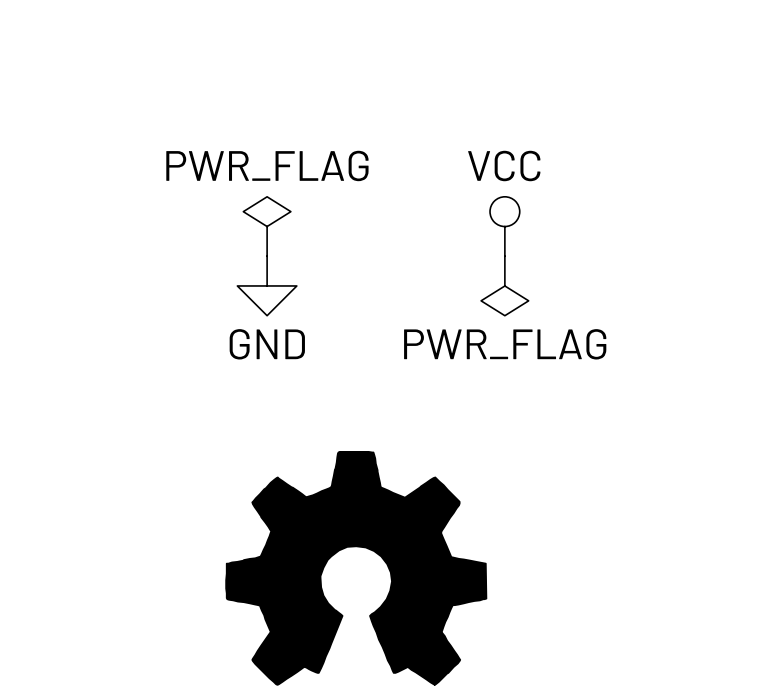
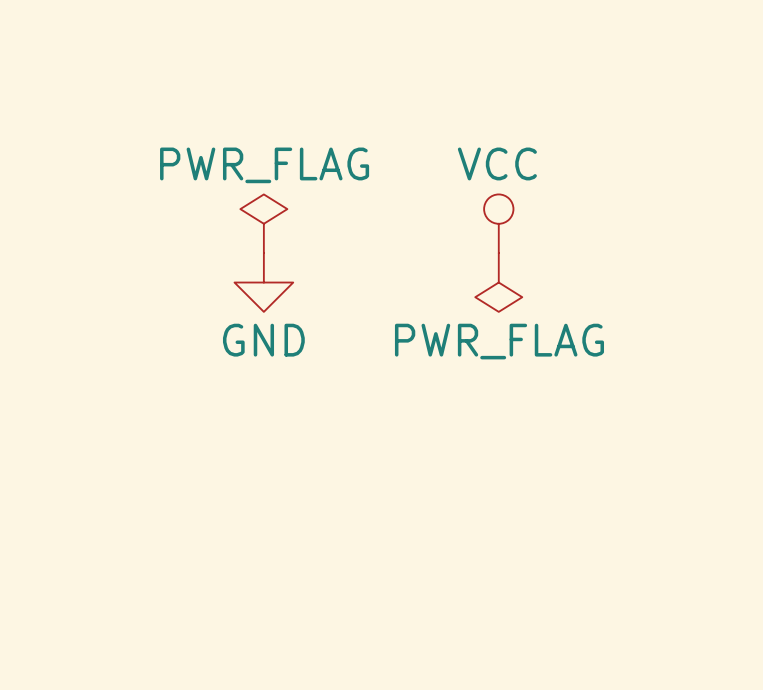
part: (356, 568) -> none

